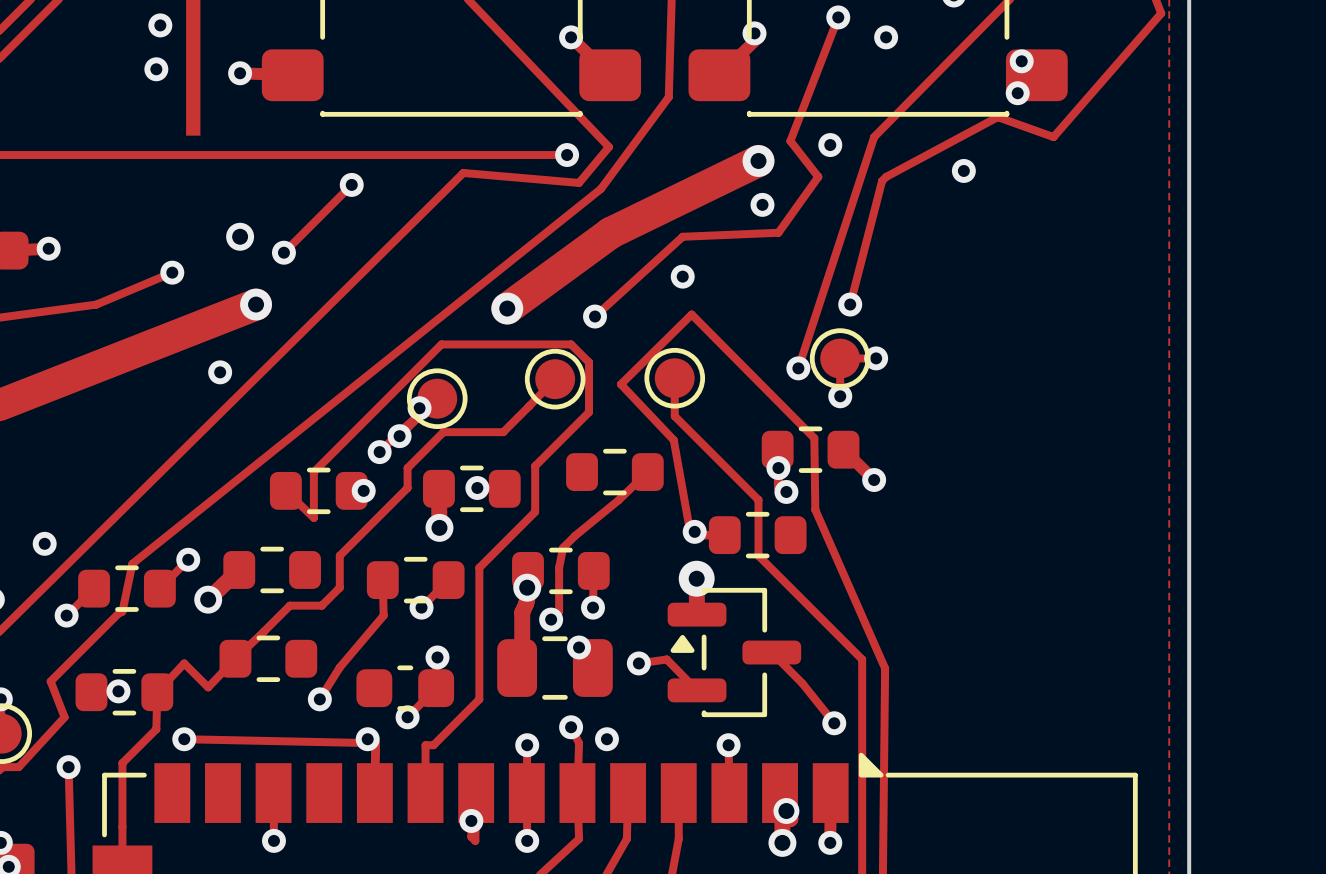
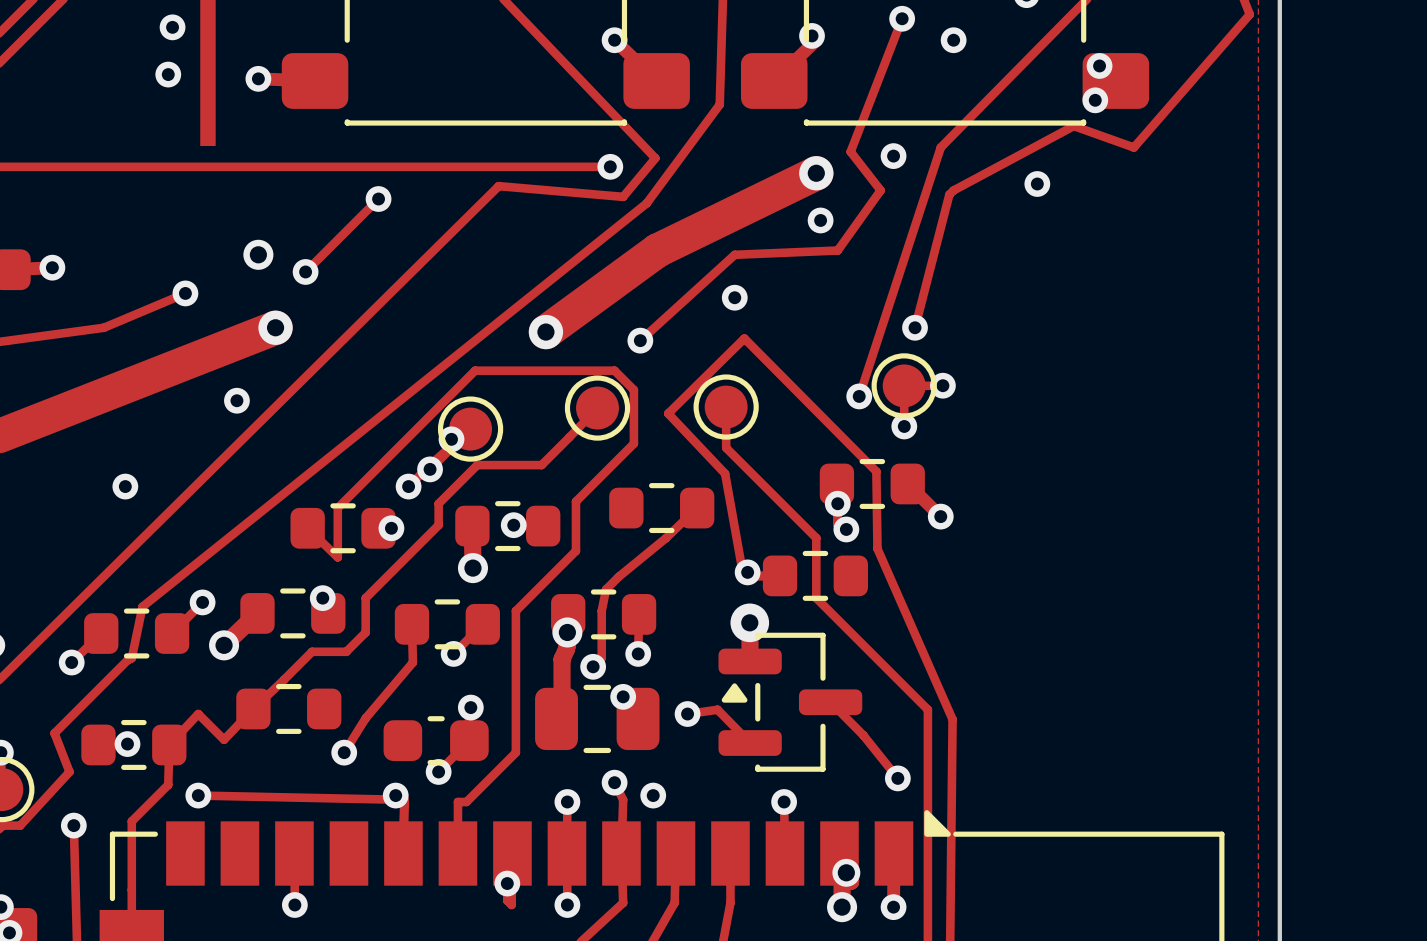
via position: (44, 543) -> (125, 486)
via: none -> (322, 598)

